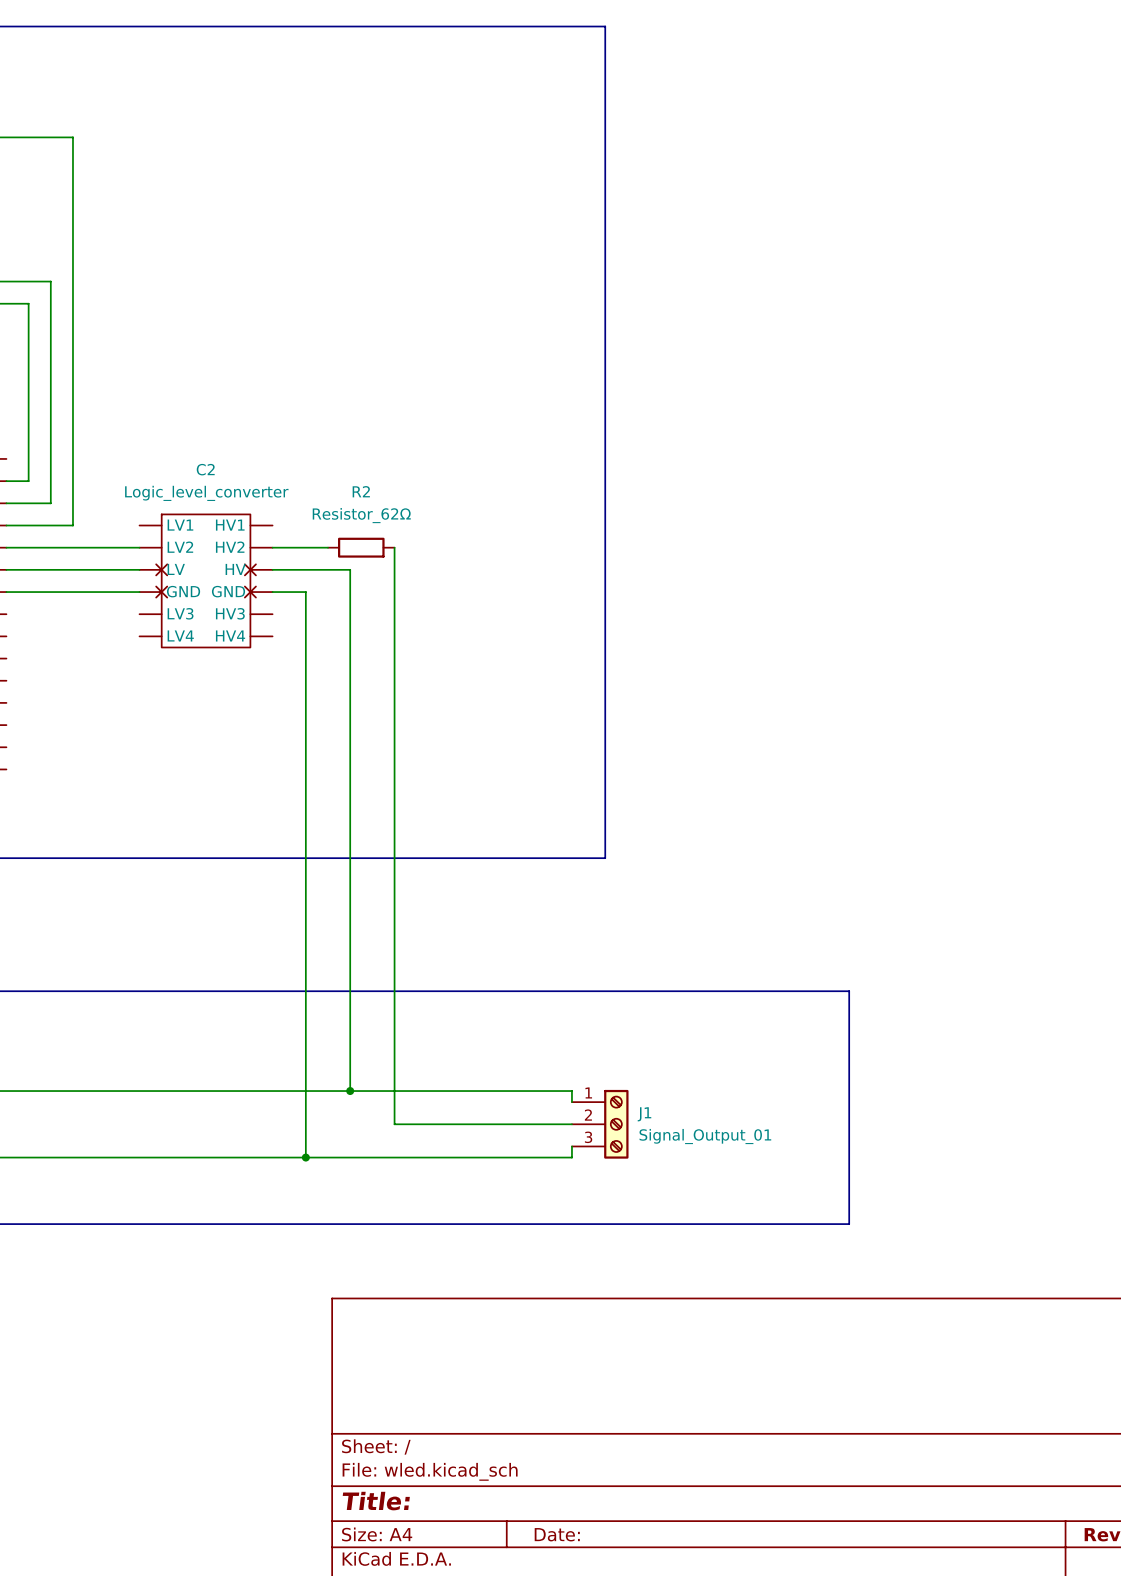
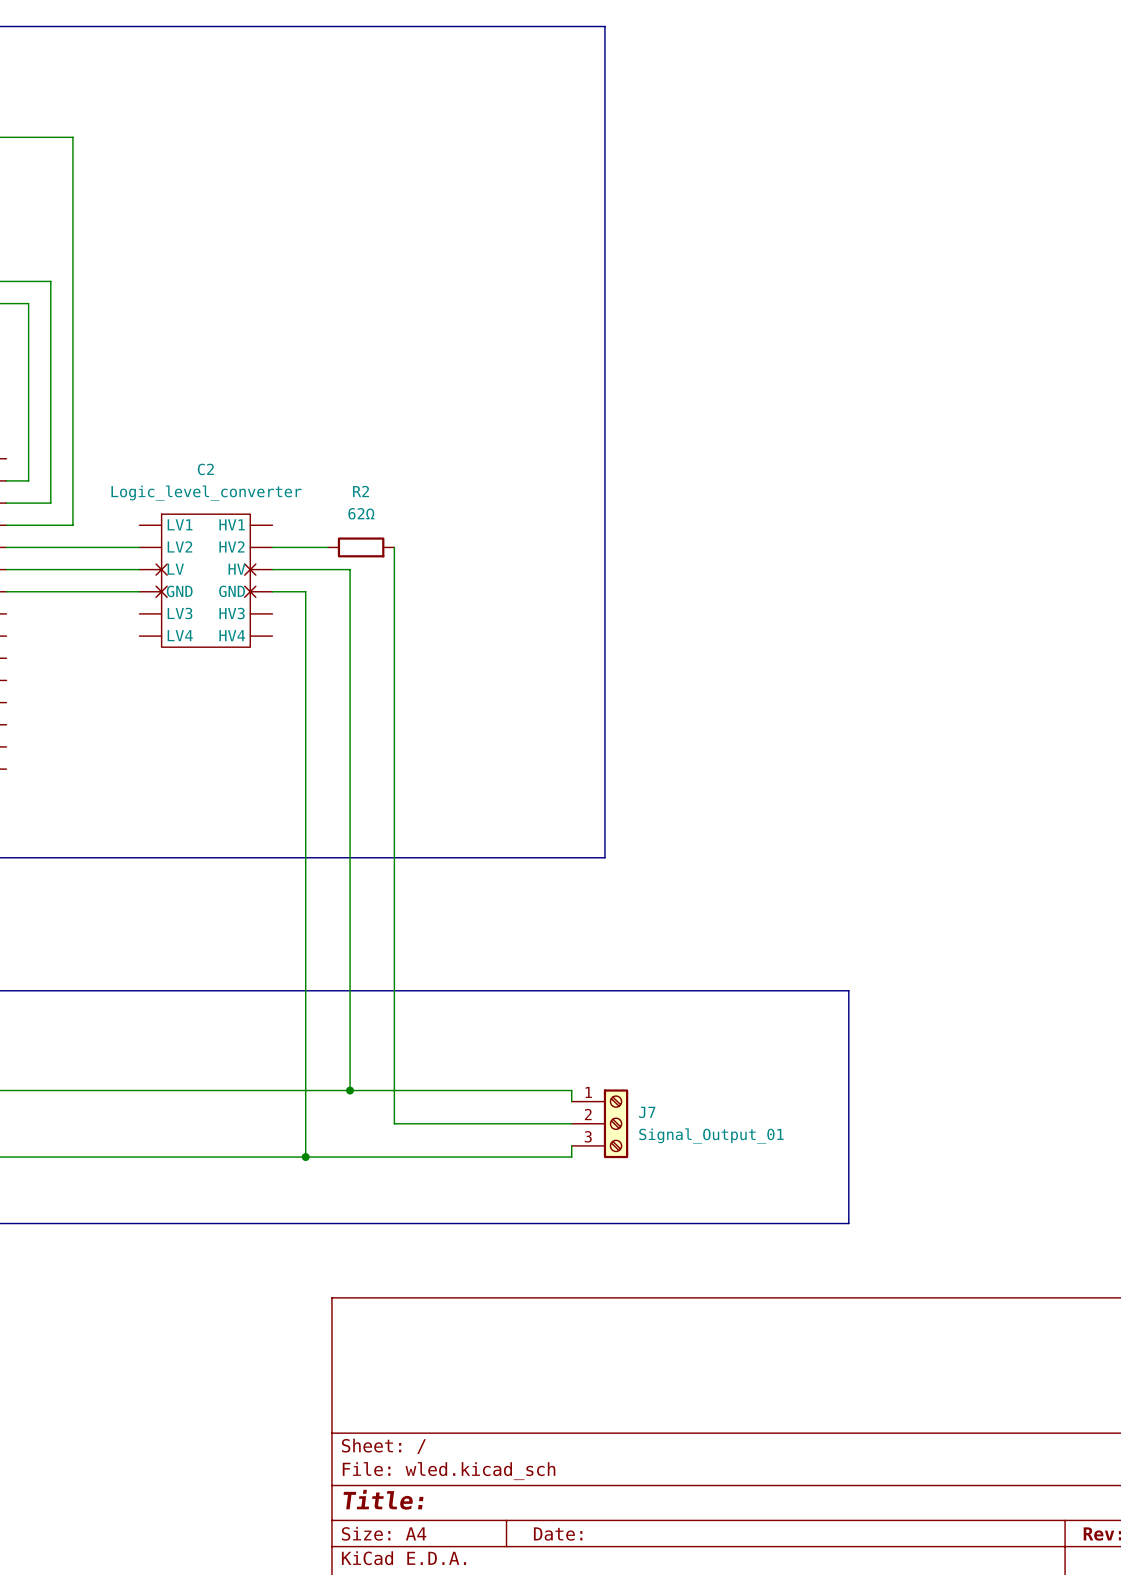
R2 value: Resistor_62Ω (361, 515) -> 62Ω (361, 513)
J1 name: J1 (644, 1114) -> J7 (647, 1112)

